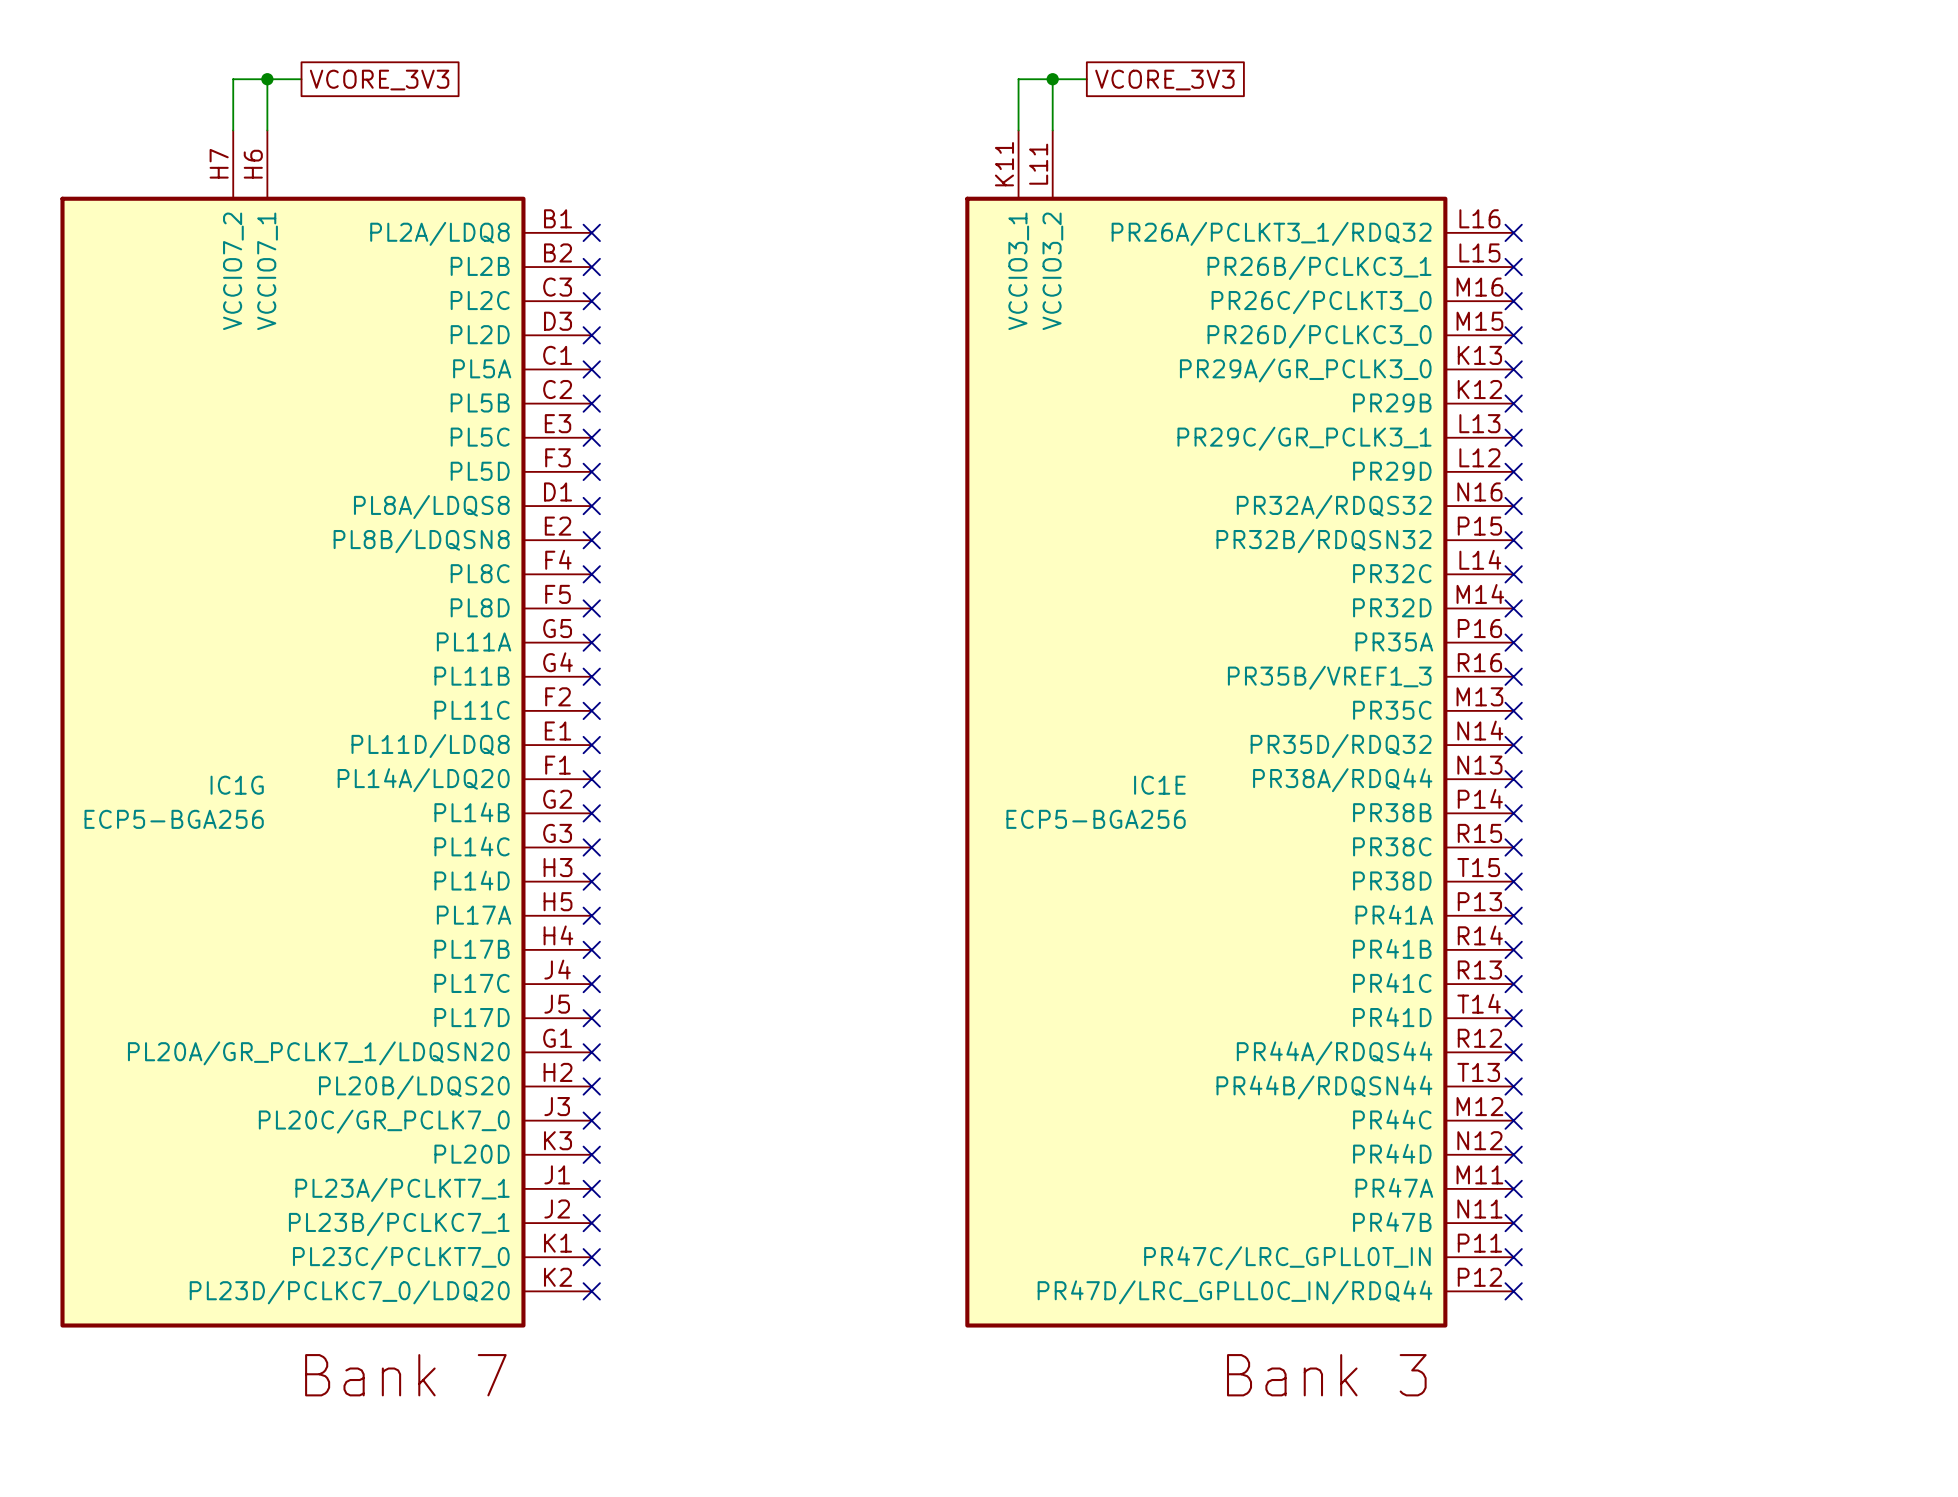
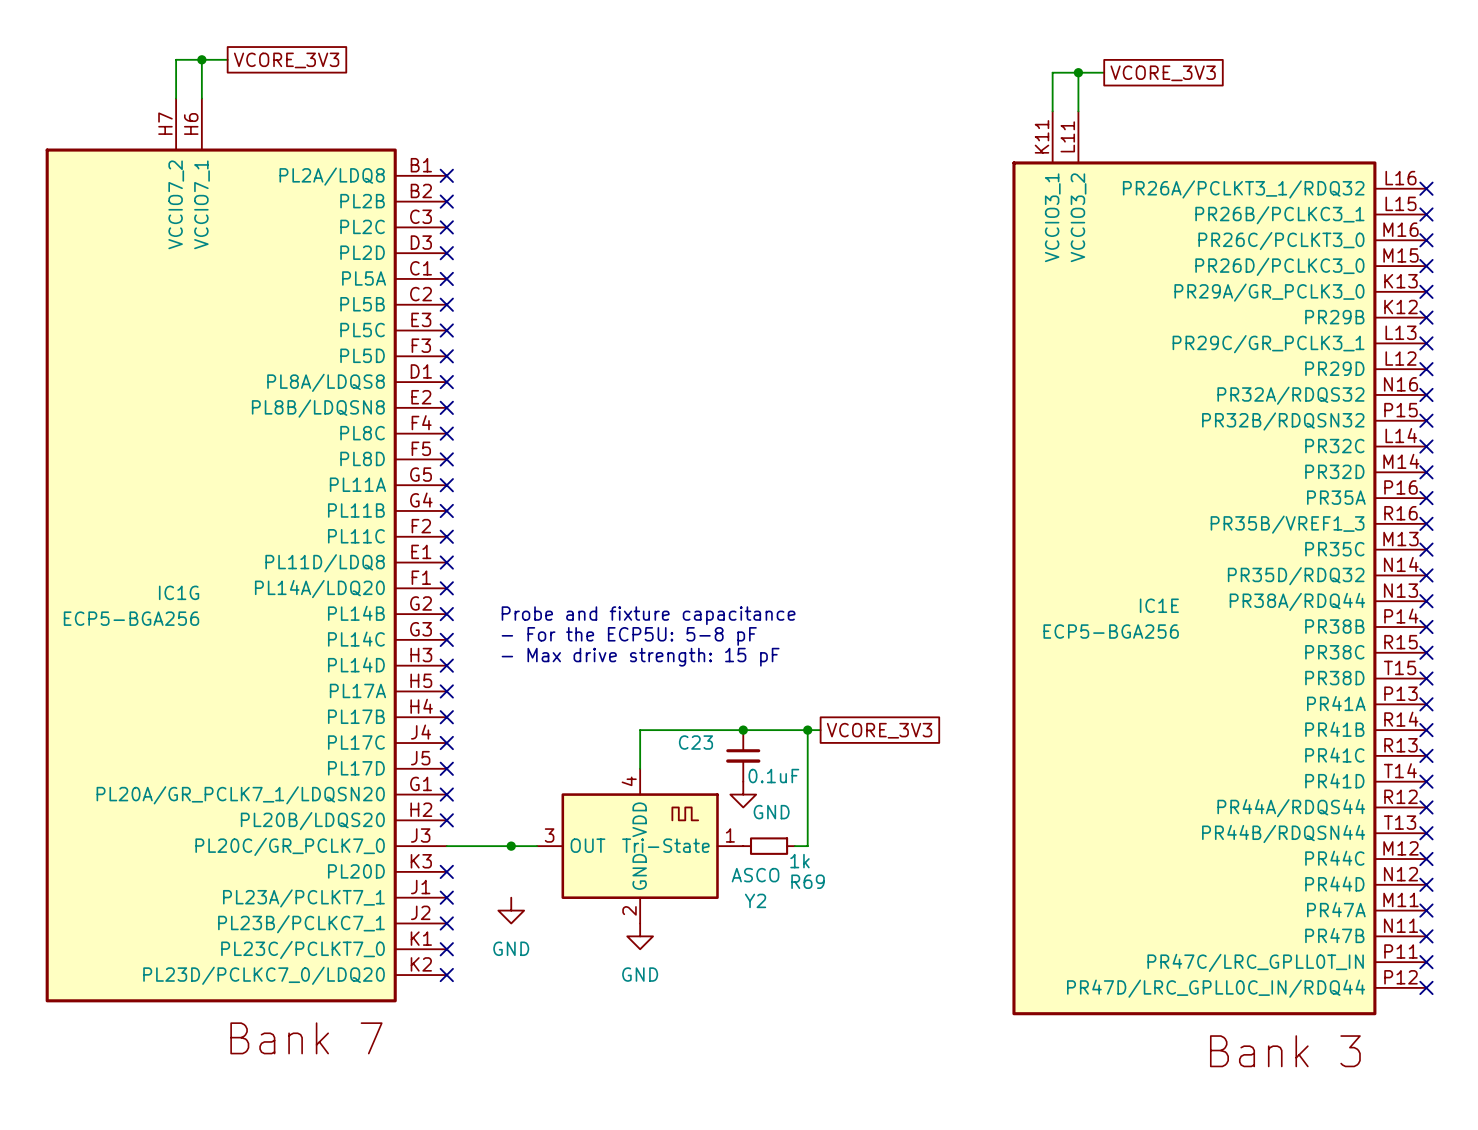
wire: (1052, 79) (1052, 130) -> none
junction: (1052, 79) -> none
wire: (1086, 79) (1018, 79) (1018, 130) -> none
global label: VCORE_3V3 (1164, 80) -> none
wire: none -> (1078, 72) (1078, 111)
junction: none -> (1078, 72)
wire: none -> (1104, 72) (1052, 72) (1052, 111)
global label: none -> VCORE_3V3 (1163, 73)
no-connect mark: (1513, 232) -> none
no-connect mark: none -> (1426, 188)
no-connect mark: (1513, 267) -> none
no-connect mark: none -> (1426, 214)
no-connect mark: (1513, 301) -> none
no-connect mark: none -> (1426, 240)
no-connect mark: (1513, 335) -> none
no-connect mark: none -> (1426, 266)
no-connect mark: (1513, 369) -> none
no-connect mark: none -> (1426, 291)
no-connect mark: (1513, 403) -> none
no-connect mark: none -> (1426, 317)
no-connect mark: (1513, 437) -> none
no-connect mark: none -> (1426, 343)
no-connect mark: (1513, 471) -> none
no-connect mark: none -> (1426, 369)
no-connect mark: (1513, 506) -> none
no-connect mark: none -> (1426, 394)
no-connect mark: (1513, 540) -> none
no-connect mark: none -> (1426, 420)
no-connect mark: (1513, 574) -> none
no-connect mark: none -> (1426, 446)
no-connect mark: (1513, 608) -> none
no-connect mark: none -> (1426, 472)
no-connect mark: (1513, 642) -> none
no-connect mark: none -> (1426, 498)
no-connect mark: (1513, 676) -> none
no-connect mark: none -> (1426, 523)
no-connect mark: (1513, 710) -> none
no-connect mark: none -> (1426, 549)
IC1E position: (1239, 729) -> (1219, 563)
no-connect mark: (1513, 745) -> none
no-connect mark: none -> (1426, 575)
no-connect mark: (1513, 779) -> none
no-connect mark: none -> (1426, 601)
no-connect mark: (1513, 813) -> none
text: none -> Probe and fixture capacitance (648, 615)
no-connect mark: none -> (1426, 626)
text: none -> - For the ECP5U: 5-8 pF (629, 636)
no-connect mark: (1513, 847) -> none
no-connect mark: none -> (1426, 652)
text: none -> - Max drive strength: 15 pF (640, 657)
no-connect mark: (1513, 881) -> none
no-connect mark: none -> (1426, 678)
no-connect mark: (1513, 915) -> none
no-connect mark: none -> (1426, 704)
no-connect mark: (1513, 949) -> none
junction: none -> (743, 730)
junction: none -> (807, 730)
wire: none -> (820, 730) (640, 730) (640, 768)
no-connect mark: none -> (1426, 730)
global label: none -> VCORE_3V3 (879, 730)
no-connect mark: (1513, 984) -> none
C23: none -> 0.1uF (743, 755)
no-connect mark: none -> (1426, 755)
no-connect mark: (1513, 1018) -> none
no-connect mark: none -> (1426, 781)
power symbol: none -> GND (743, 794)
no-connect mark: (1513, 1052) -> none
no-connect mark: none -> (1426, 807)
no-connect mark: (1513, 1086) -> none
no-connect mark: none -> (1426, 833)
wire: none -> (446, 846) (537, 846)
no-connect mark: (591, 1120) -> none
junction: none -> (511, 846)
Y2: none -> ASCO (640, 846)
R69: none -> 1k (769, 846)
no-connect mark: (1513, 1120) -> none
no-connect mark: none -> (1426, 859)
no-connect mark: (1513, 1154) -> none
no-connect mark: none -> (1426, 884)
no-connect mark: (1513, 1188) -> none
power symbol: none -> GND (511, 910)
no-connect mark: none -> (1426, 910)
no-connect mark: (1513, 1223) -> none
power symbol: none -> GND (640, 936)
no-connect mark: none -> (1426, 936)
no-connect mark: (1513, 1257) -> none
no-connect mark: none -> (1426, 962)
no-connect mark: (1513, 1291) -> none
no-connect mark: none -> (1426, 987)

